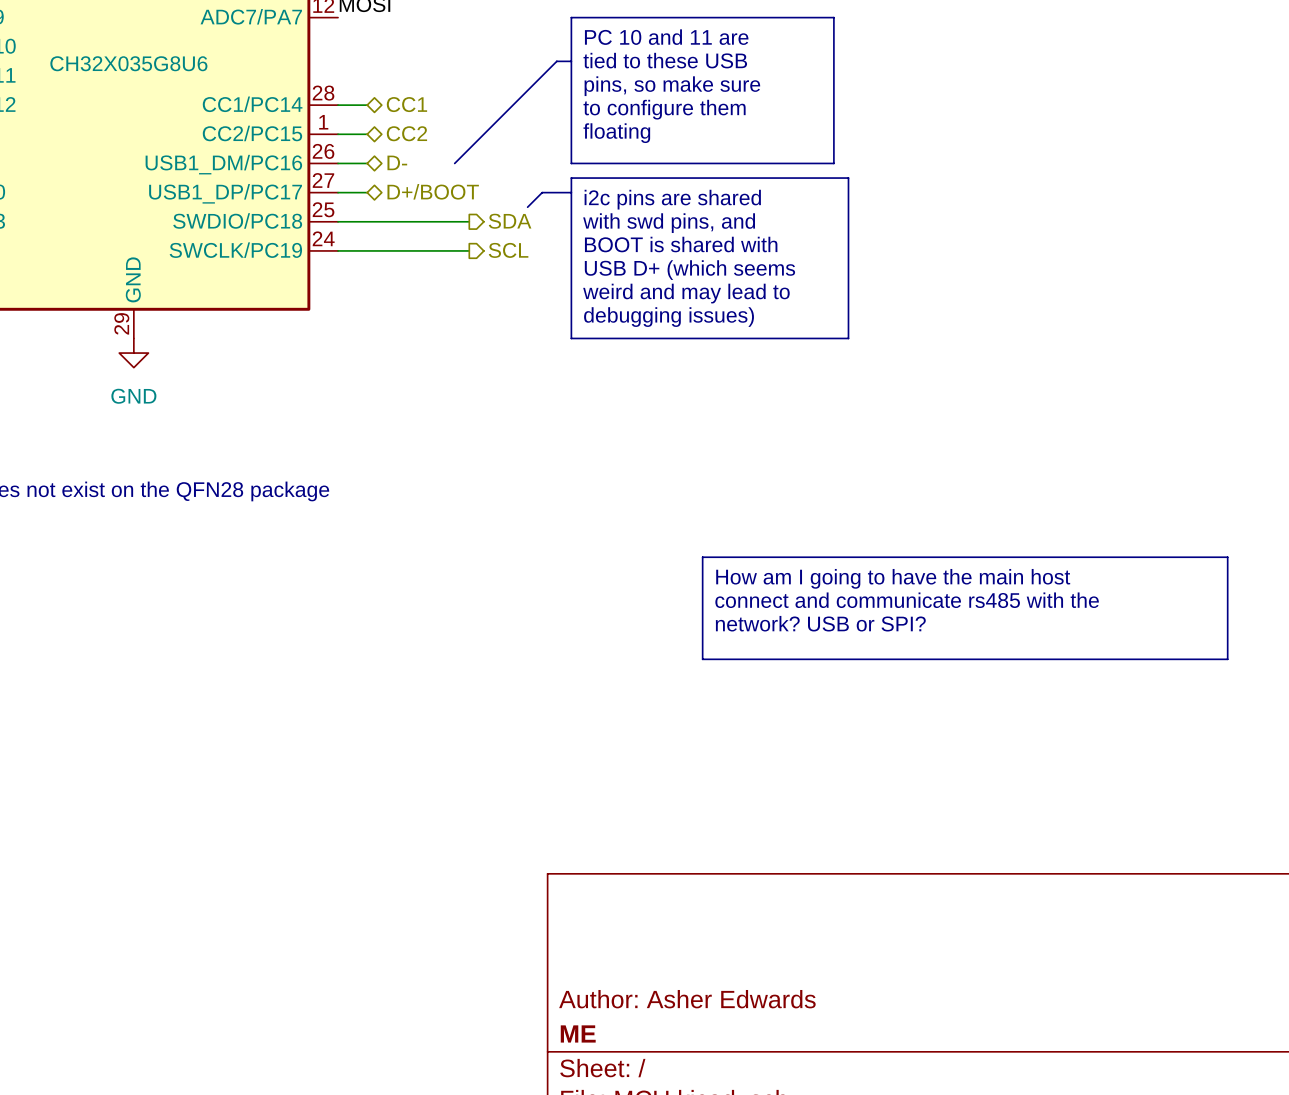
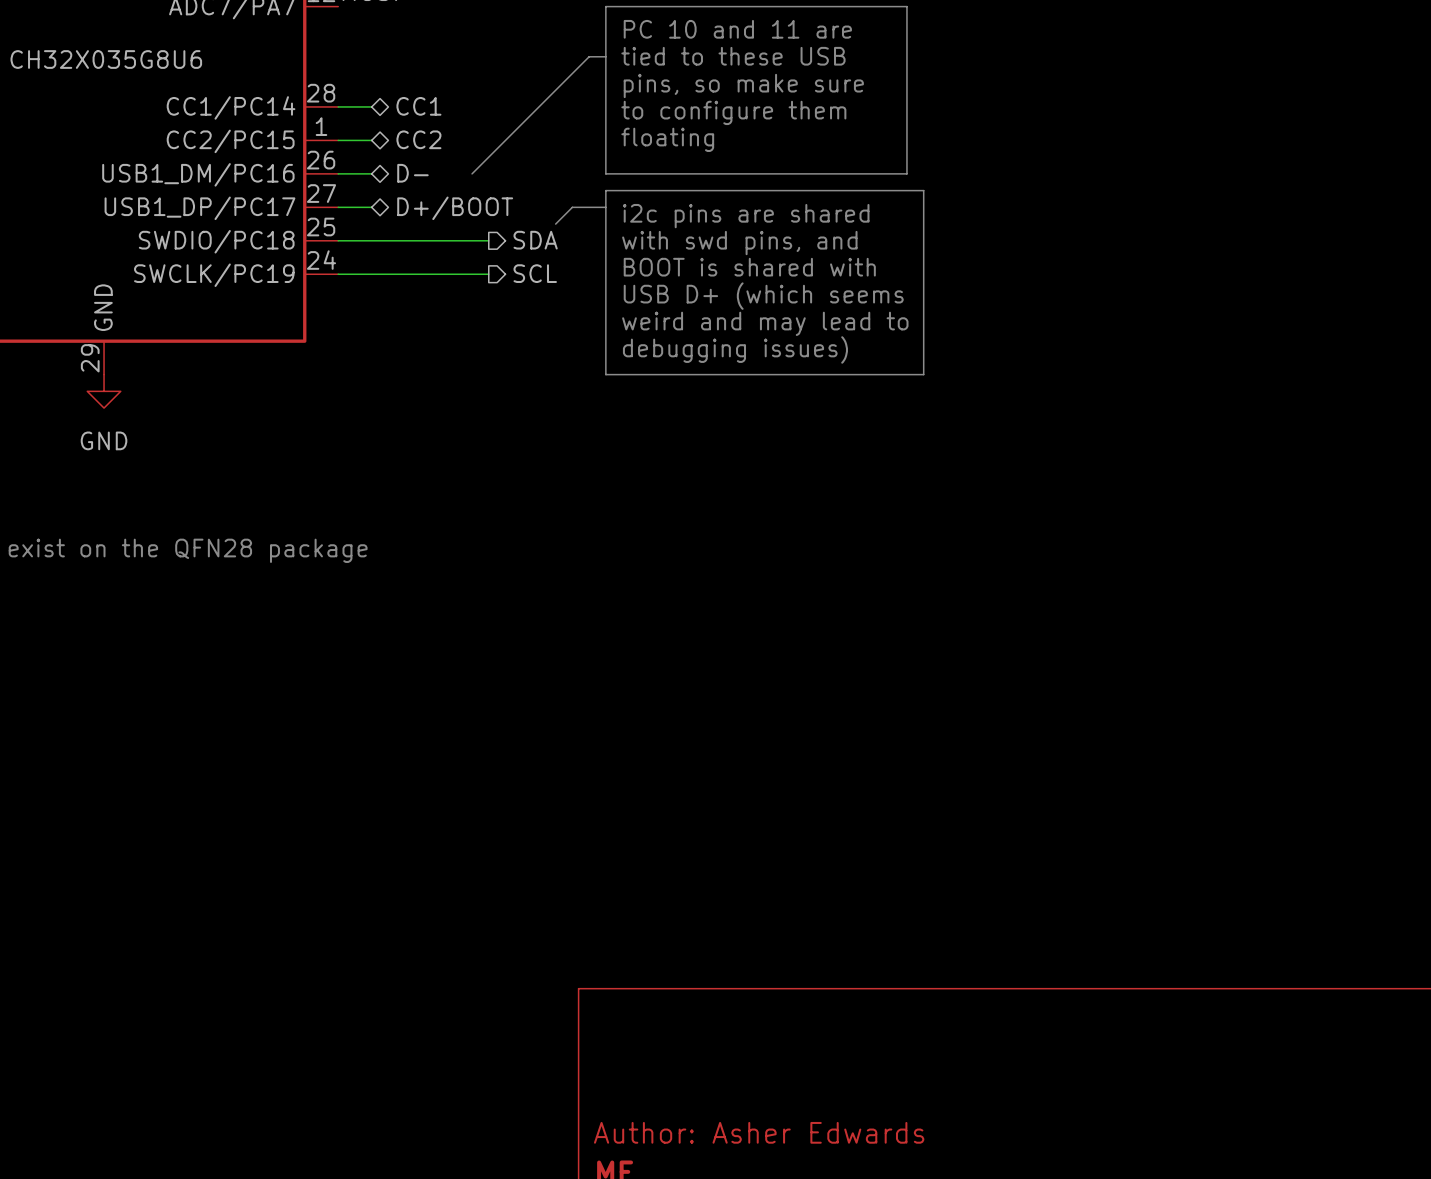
line: (702, 557) (1227, 557) (1227, 659) (702, 659) (702, 557) -> none
text: How am I going to have the main host (893, 578) -> none
text: connect and communicate rs485 with the (907, 600) -> none
text: network? USB or SPI? (820, 623) -> none

